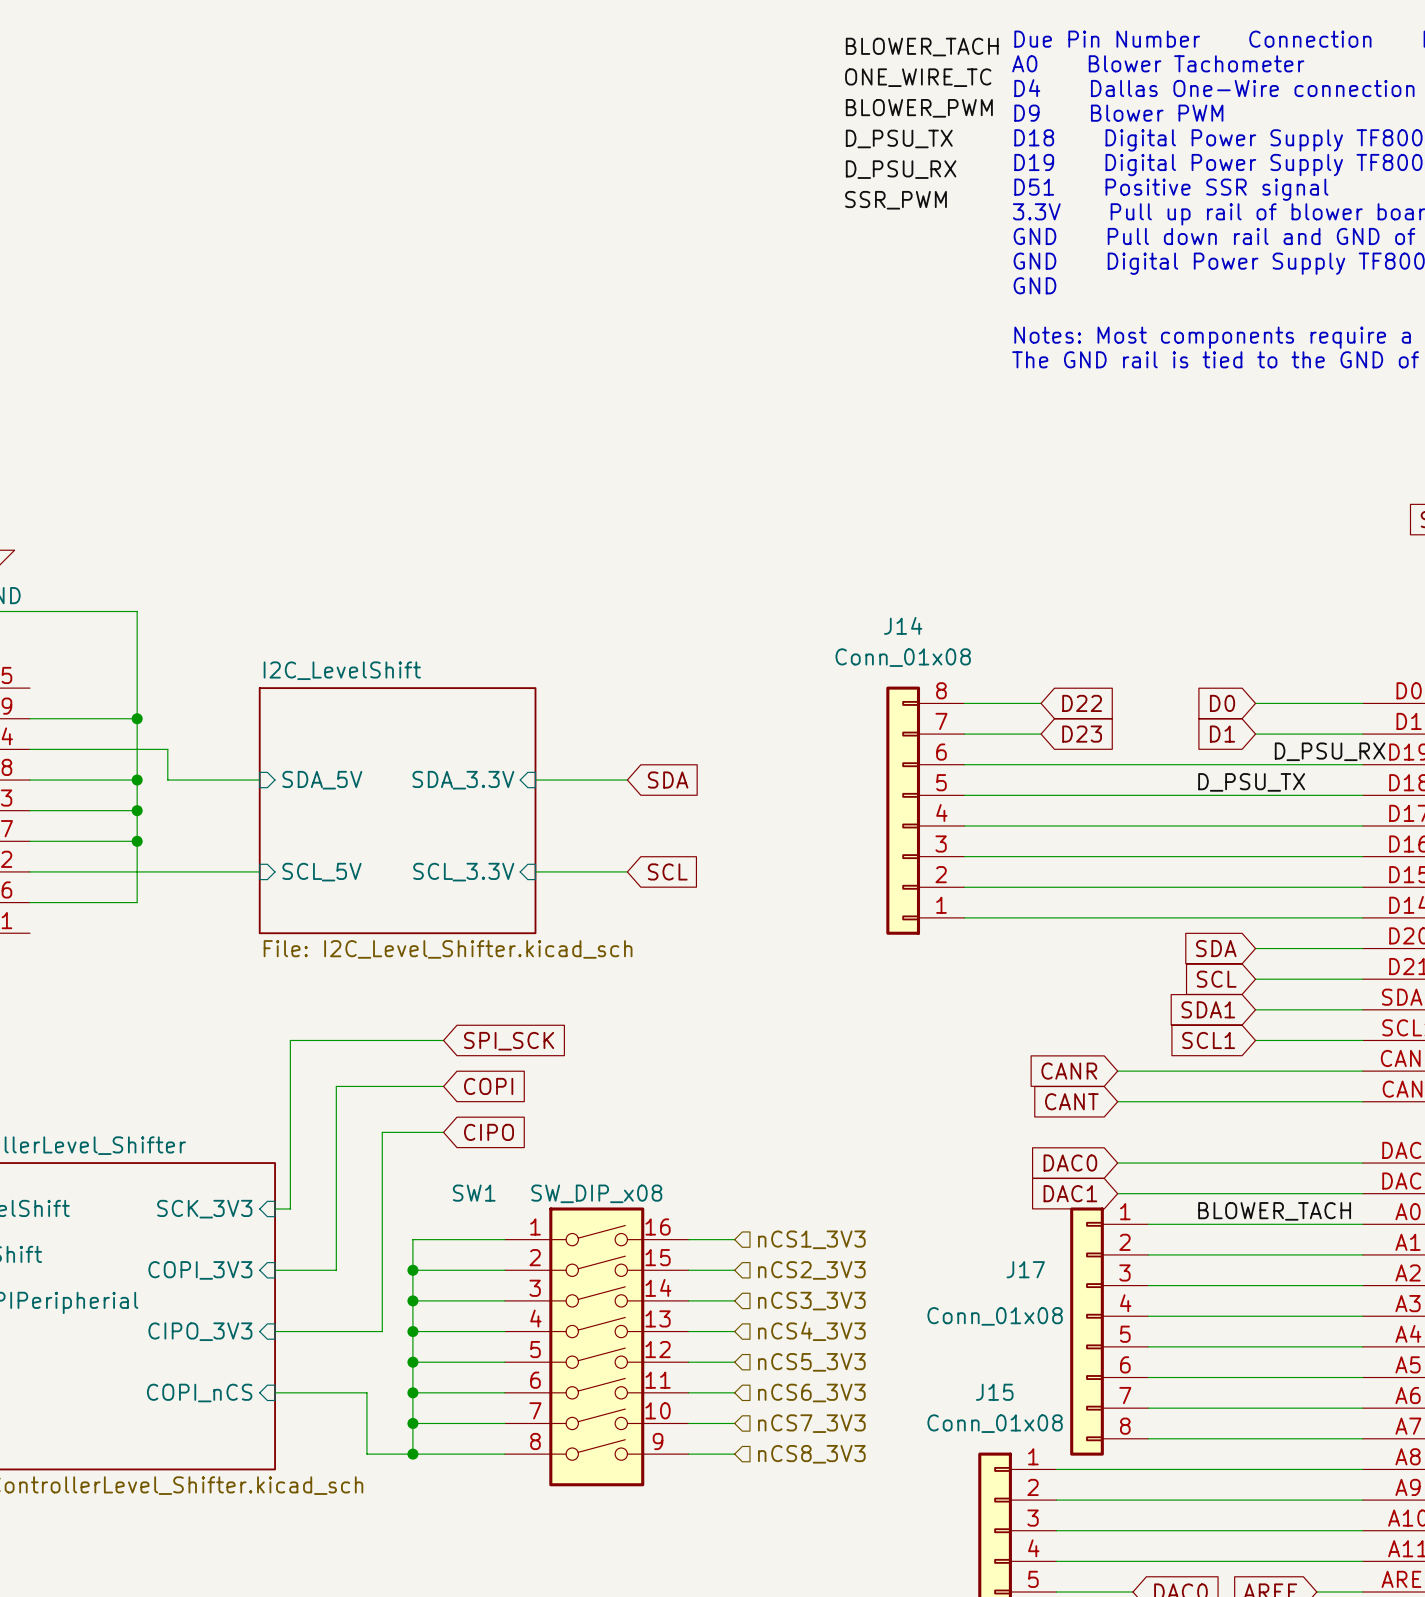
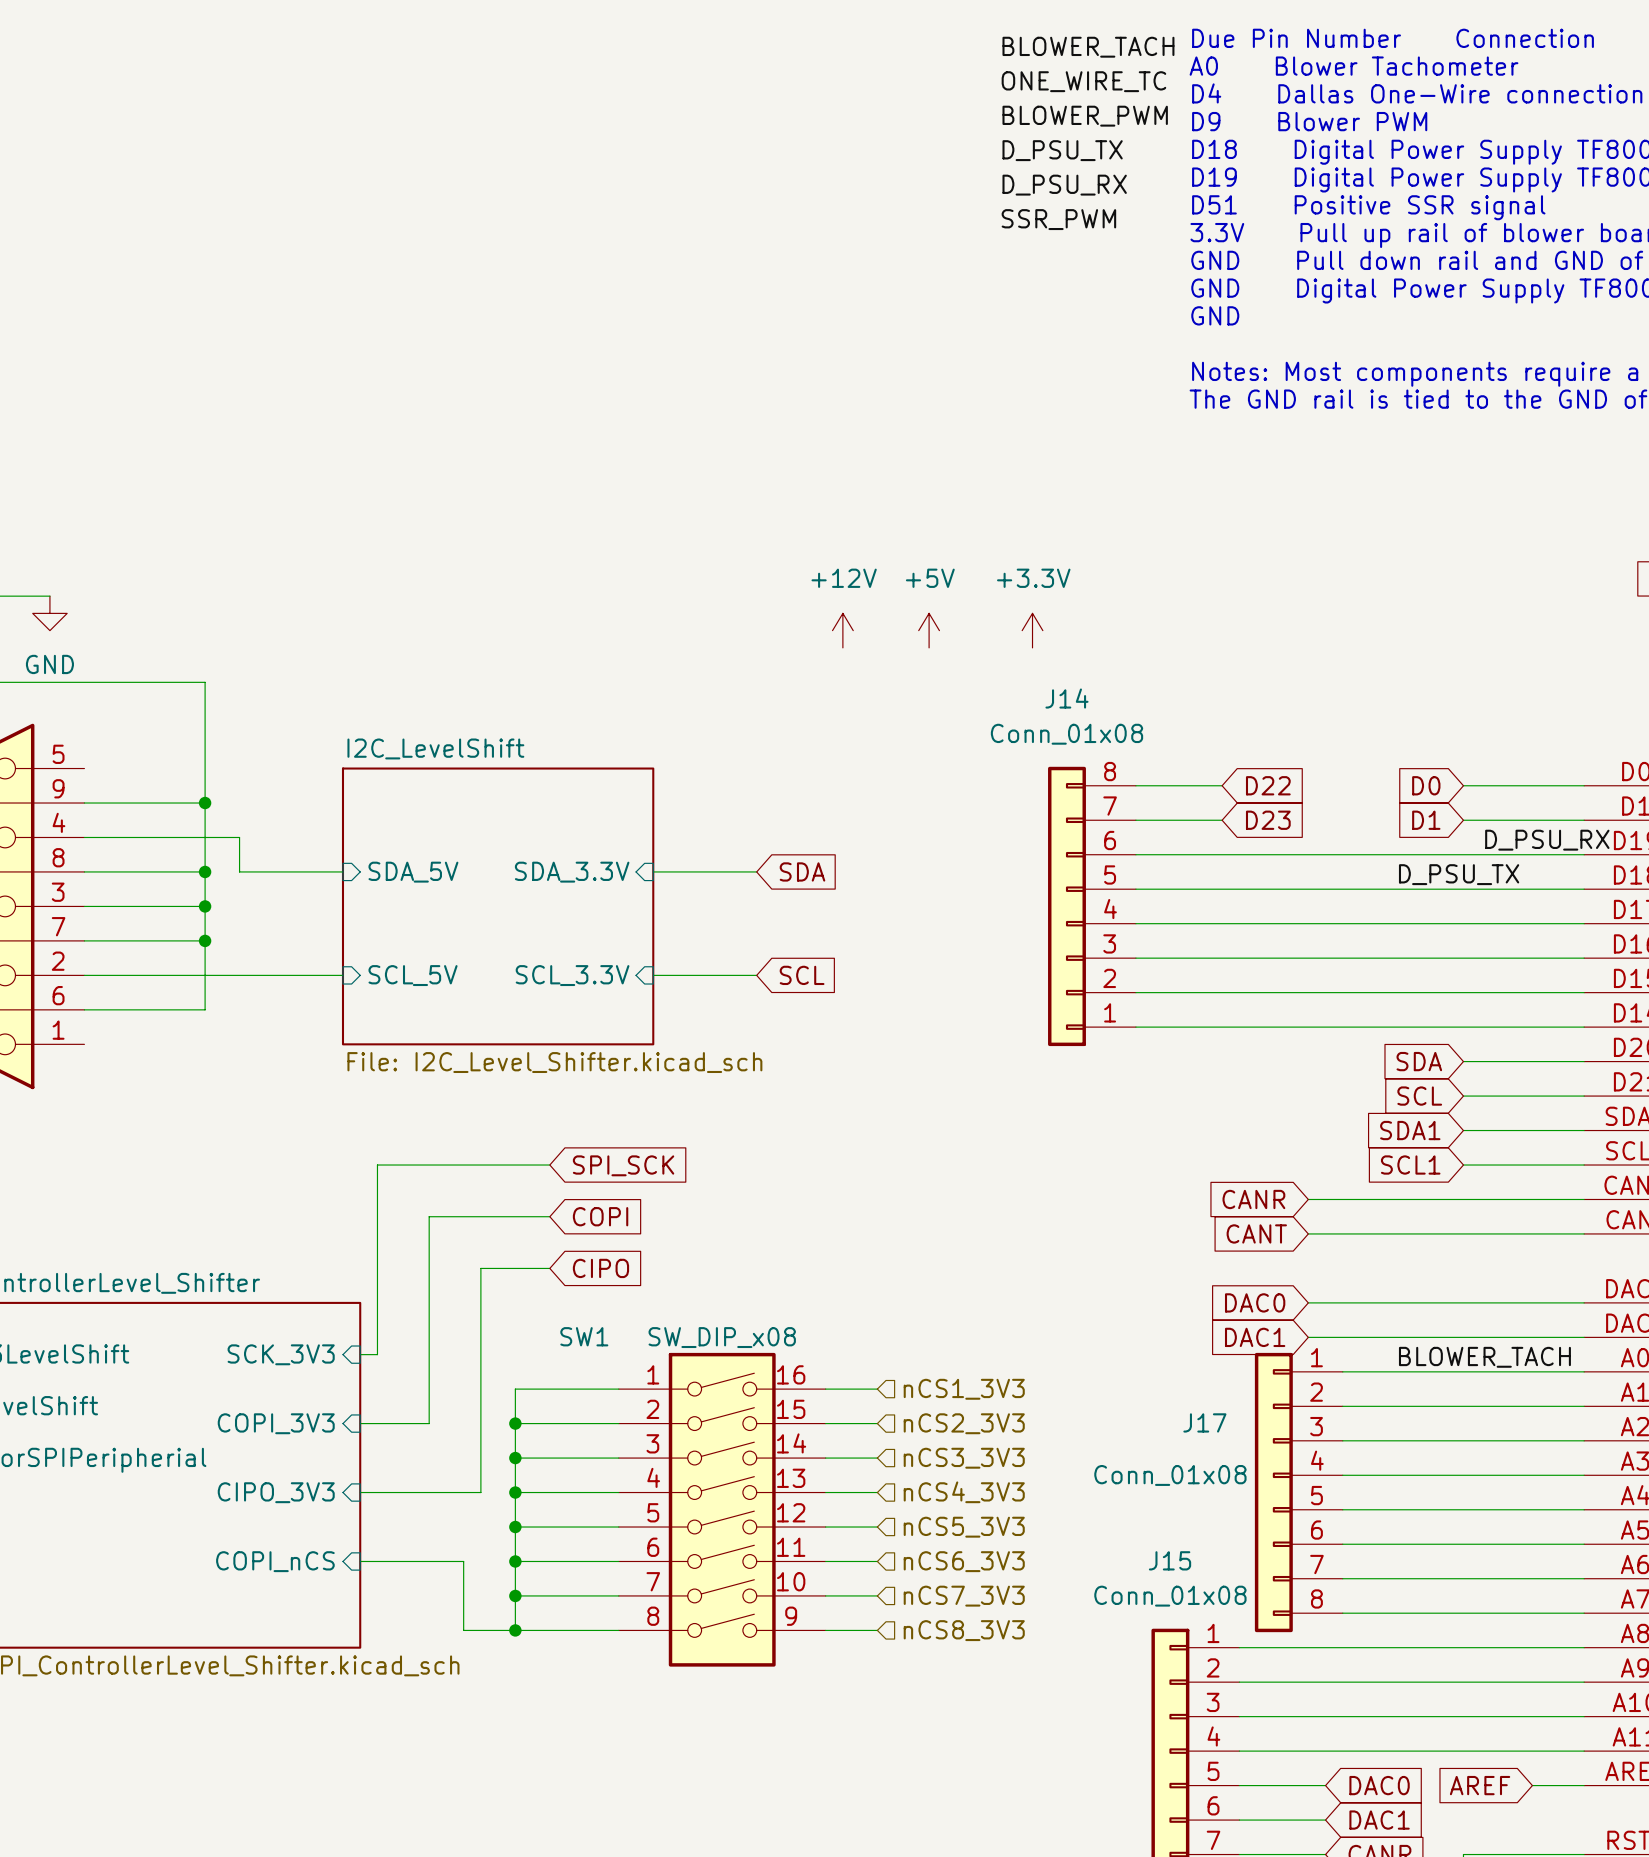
power symbol: none -> +12V (842, 630)
power symbol: none -> +5V (929, 630)
power symbol: none -> +3.3V (1032, 630)

